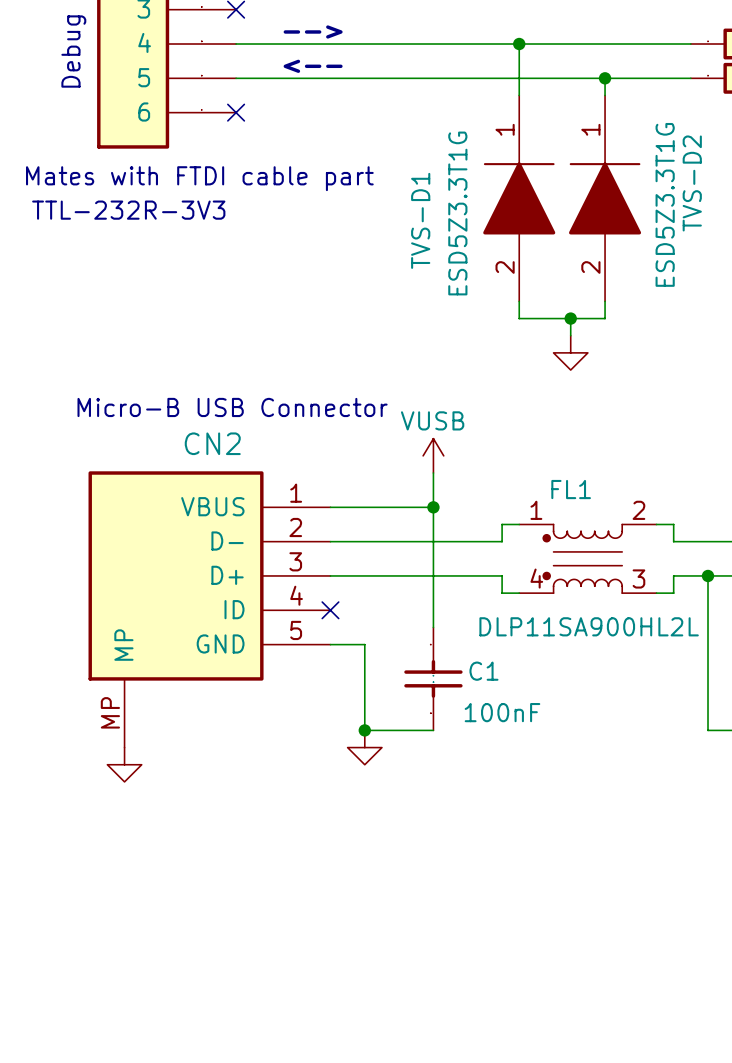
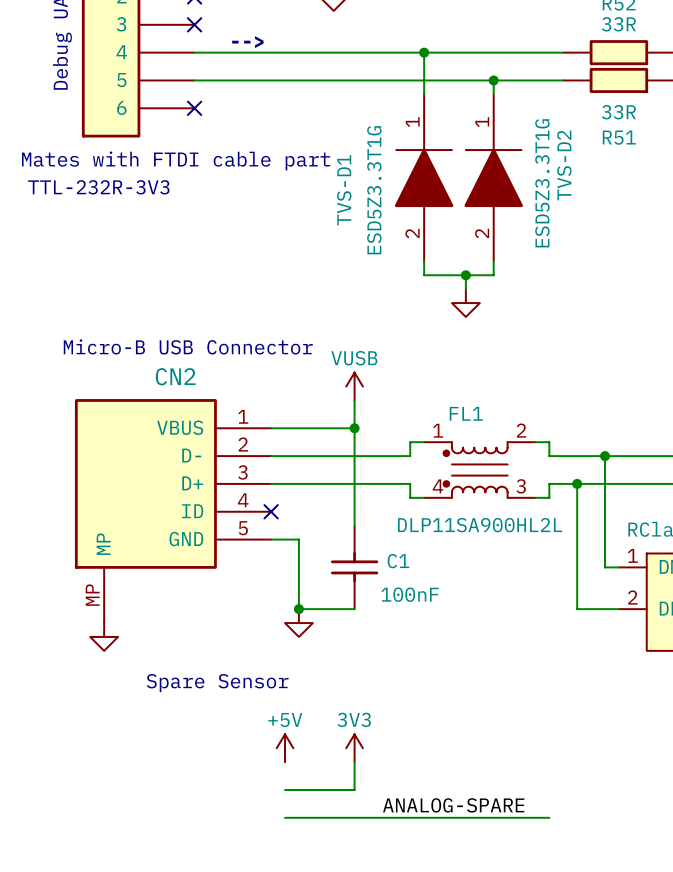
text: <-- (313, 66) -> none
text: none -> Spare Sensor (217, 683)
power symbol: none -> +5V (285, 748)
power symbol: none -> 3V3 (354, 748)
wire: none -> (354, 762) (354, 789) (285, 789)
label: none -> ANALOG-SPARE (453, 805)
wire: none -> (285, 817) (549, 817)

